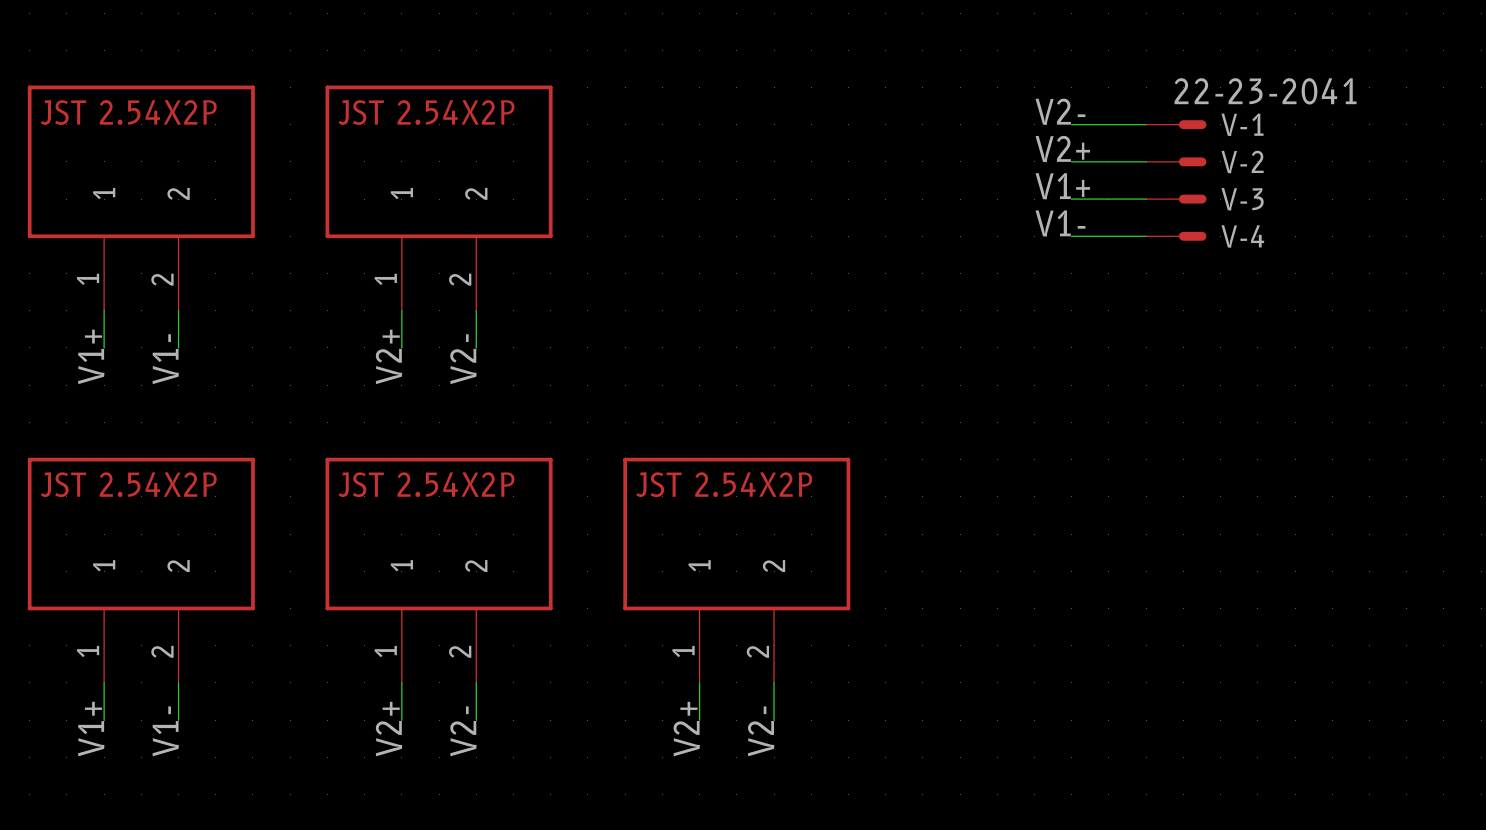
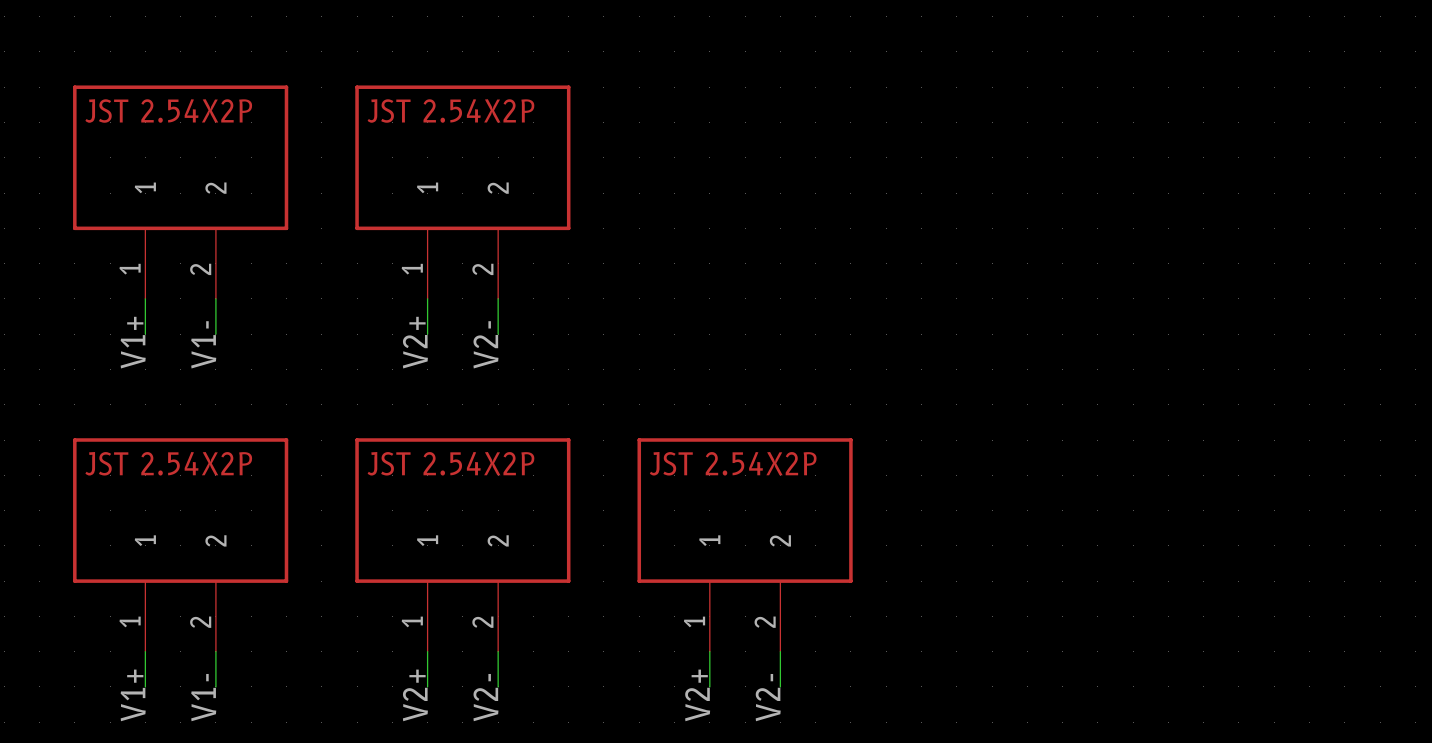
label: V2- (1060, 111) -> none
wire: (1071, 124) (1146, 124) -> none
V-1: 22-23-2041 (1176, 124) -> none
label: V2+ (1062, 149) -> none
wire: (1071, 161) (1146, 161) -> none
V-2: (1176, 161) -> none
label: V1+ (1062, 186) -> none
wire: (1071, 199) (1146, 199) -> none
V-3: (1176, 199) -> none
label: V1- (1060, 223) -> none
wire: (1071, 236) (1146, 236) -> none
V-4: (1176, 236) -> none

